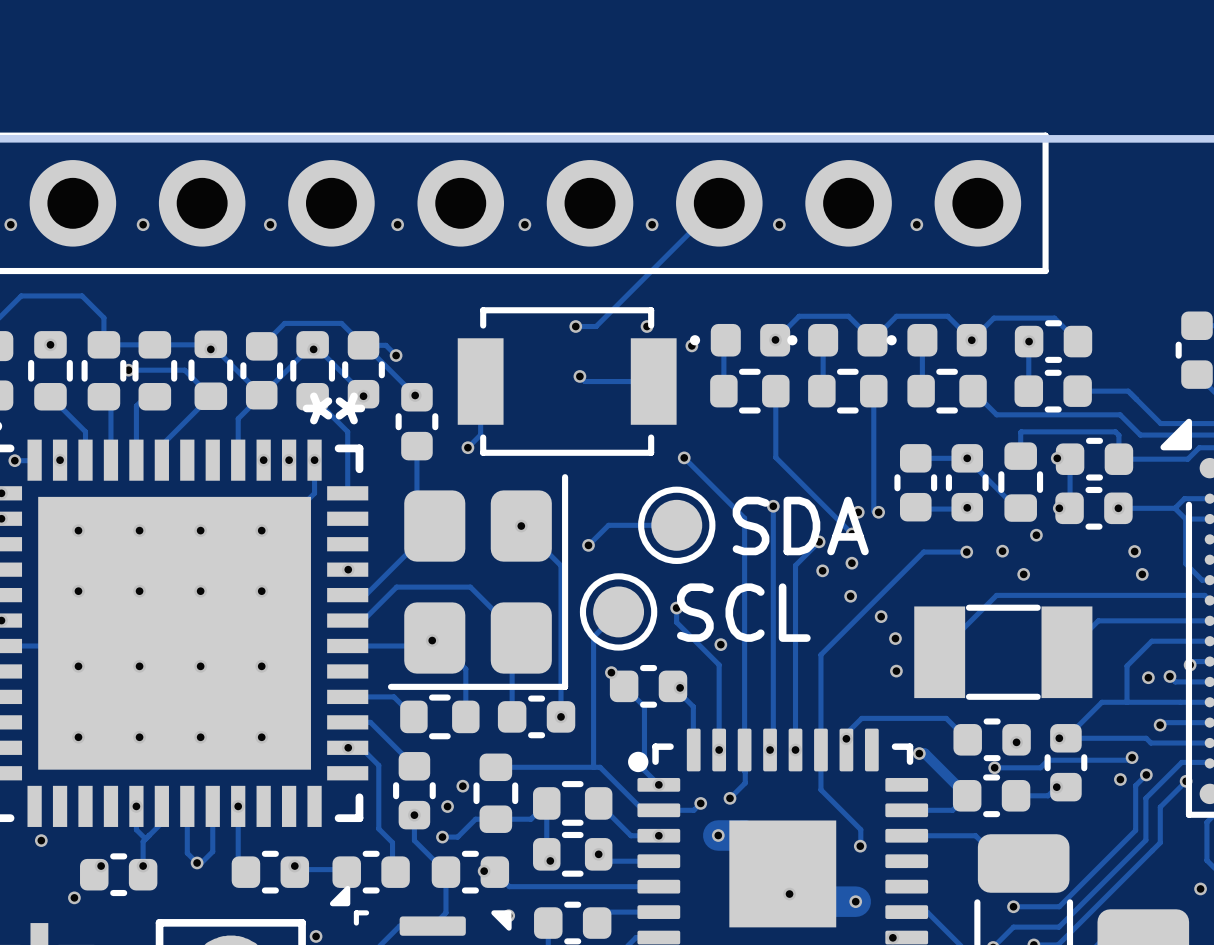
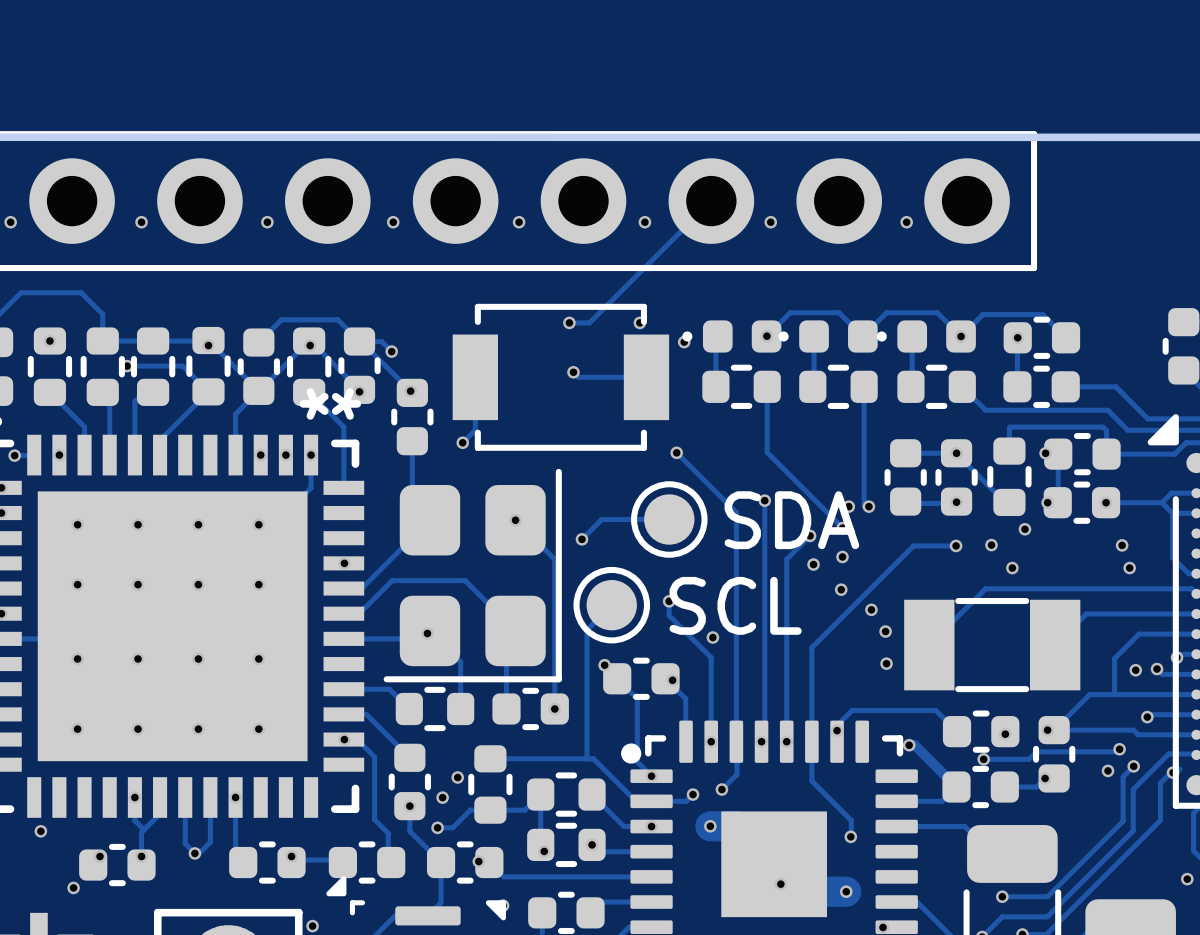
track: (1186, 781) (1160, 807) (1160, 842) -> (1180, 769) (1174, 769) (1160, 783) (1160, 820) (1147, 833)

